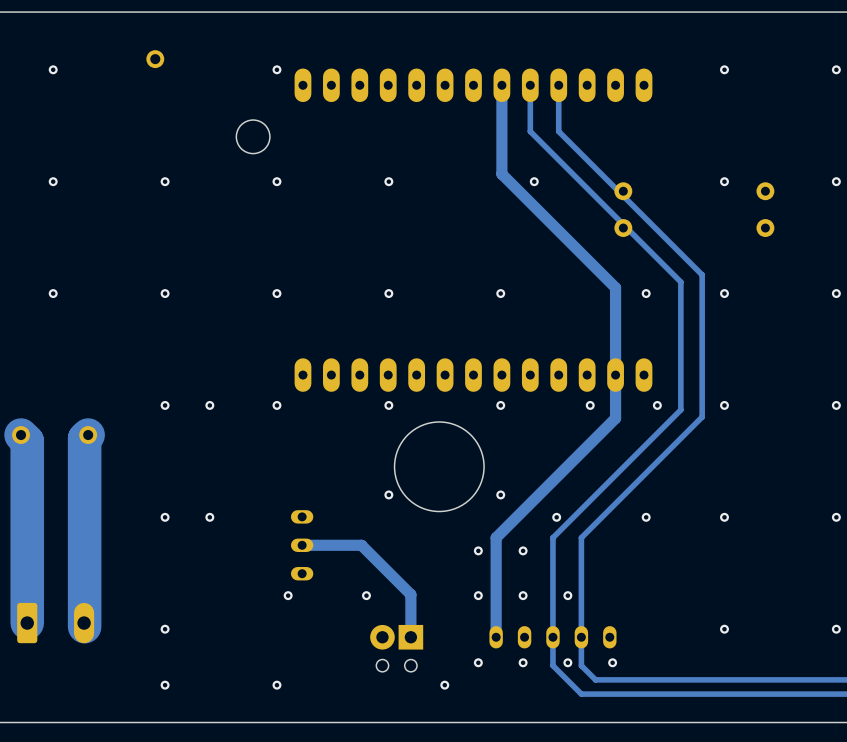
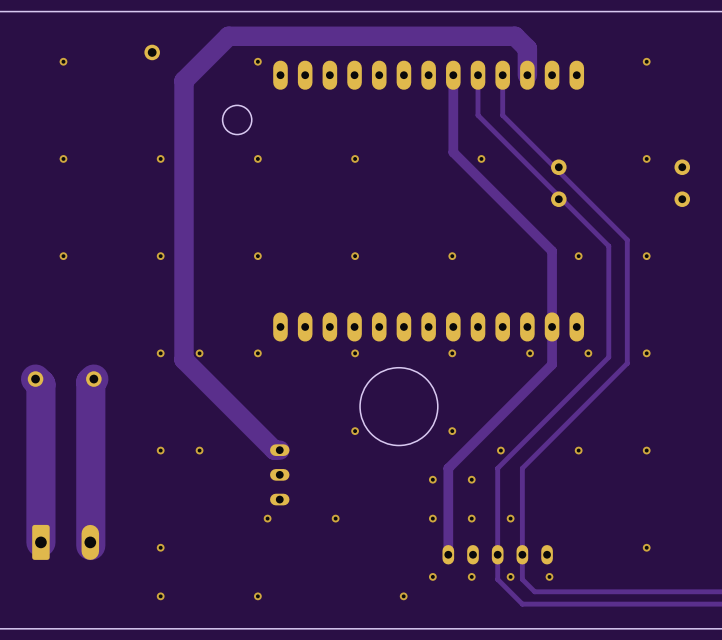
track: none -> (527, 75) (527, 48) (514, 36) (228, 36) (184, 80) (184, 359) (274, 450) (279, 450)
track: (302, 545) (361, 545) (410, 594) (410, 637) -> none
part: (396, 648) -> none

